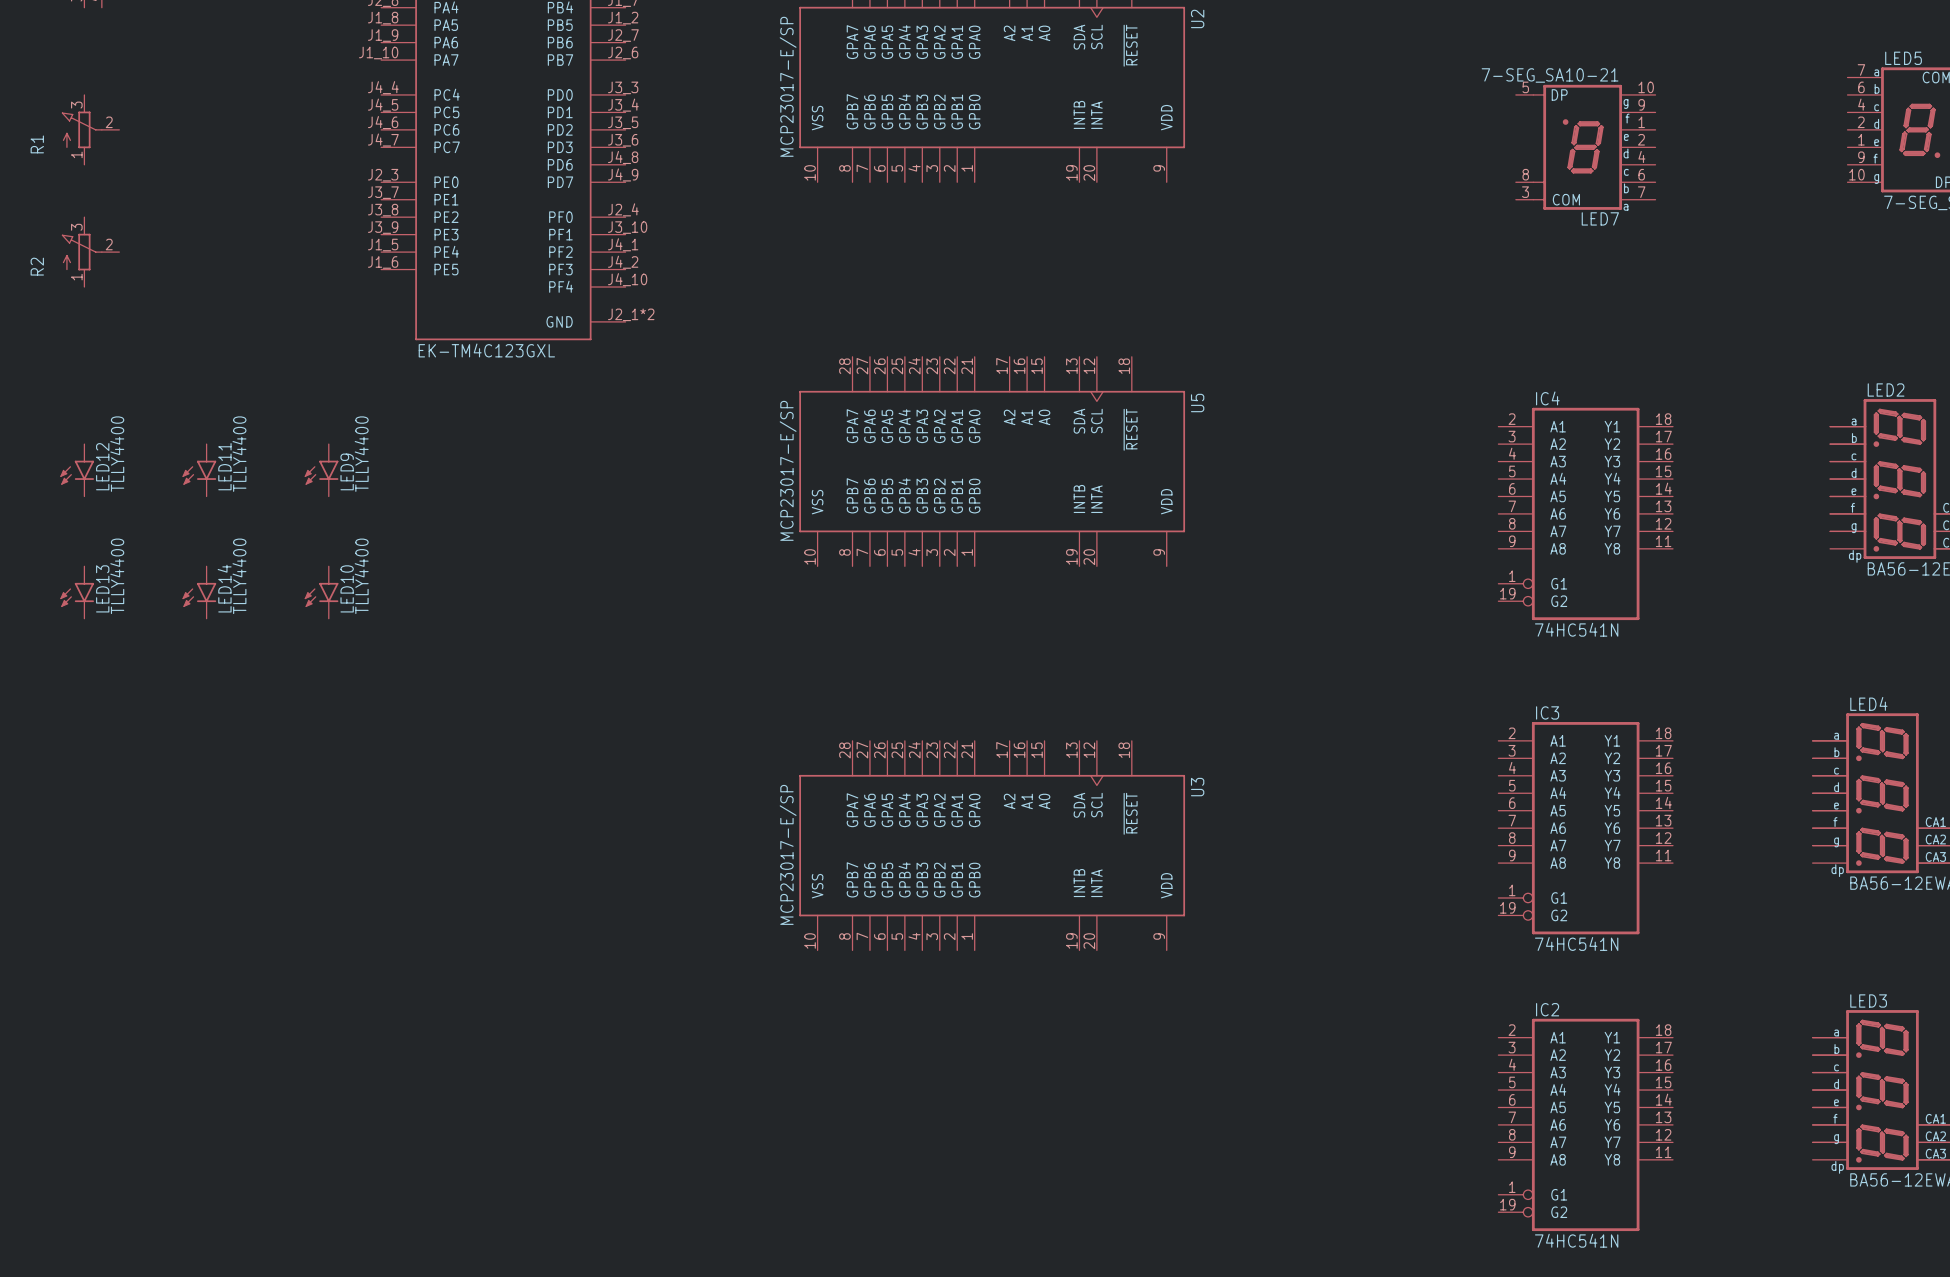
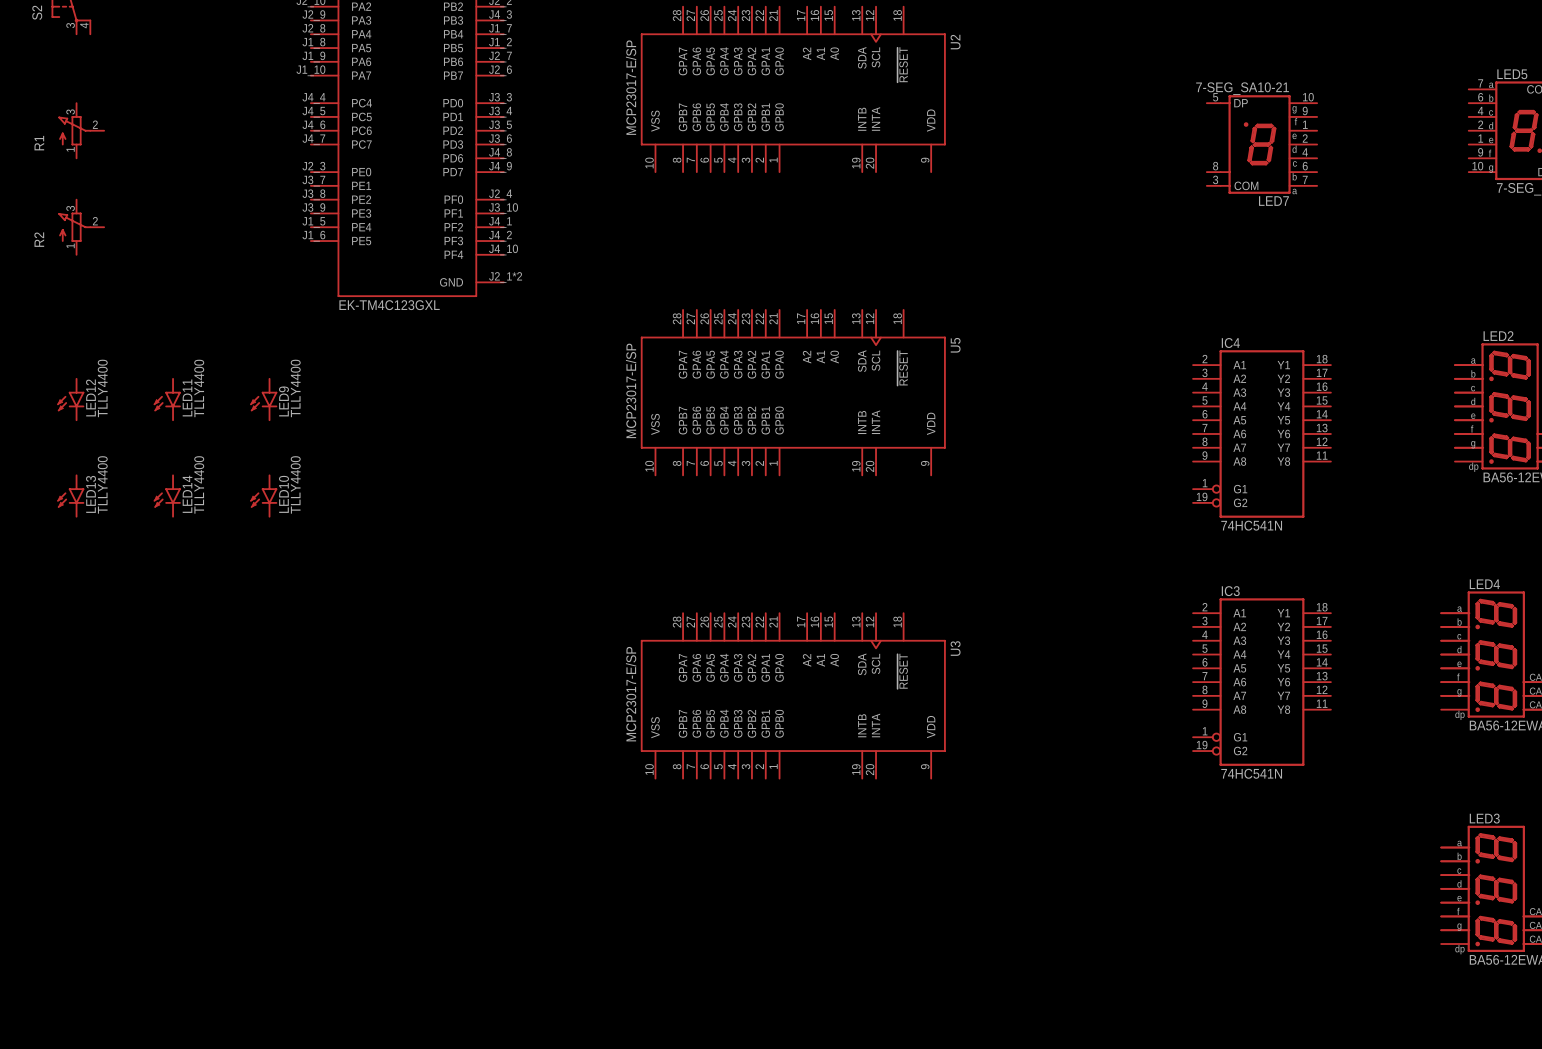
IC2: 74HC541N (1585, 1124) -> none

